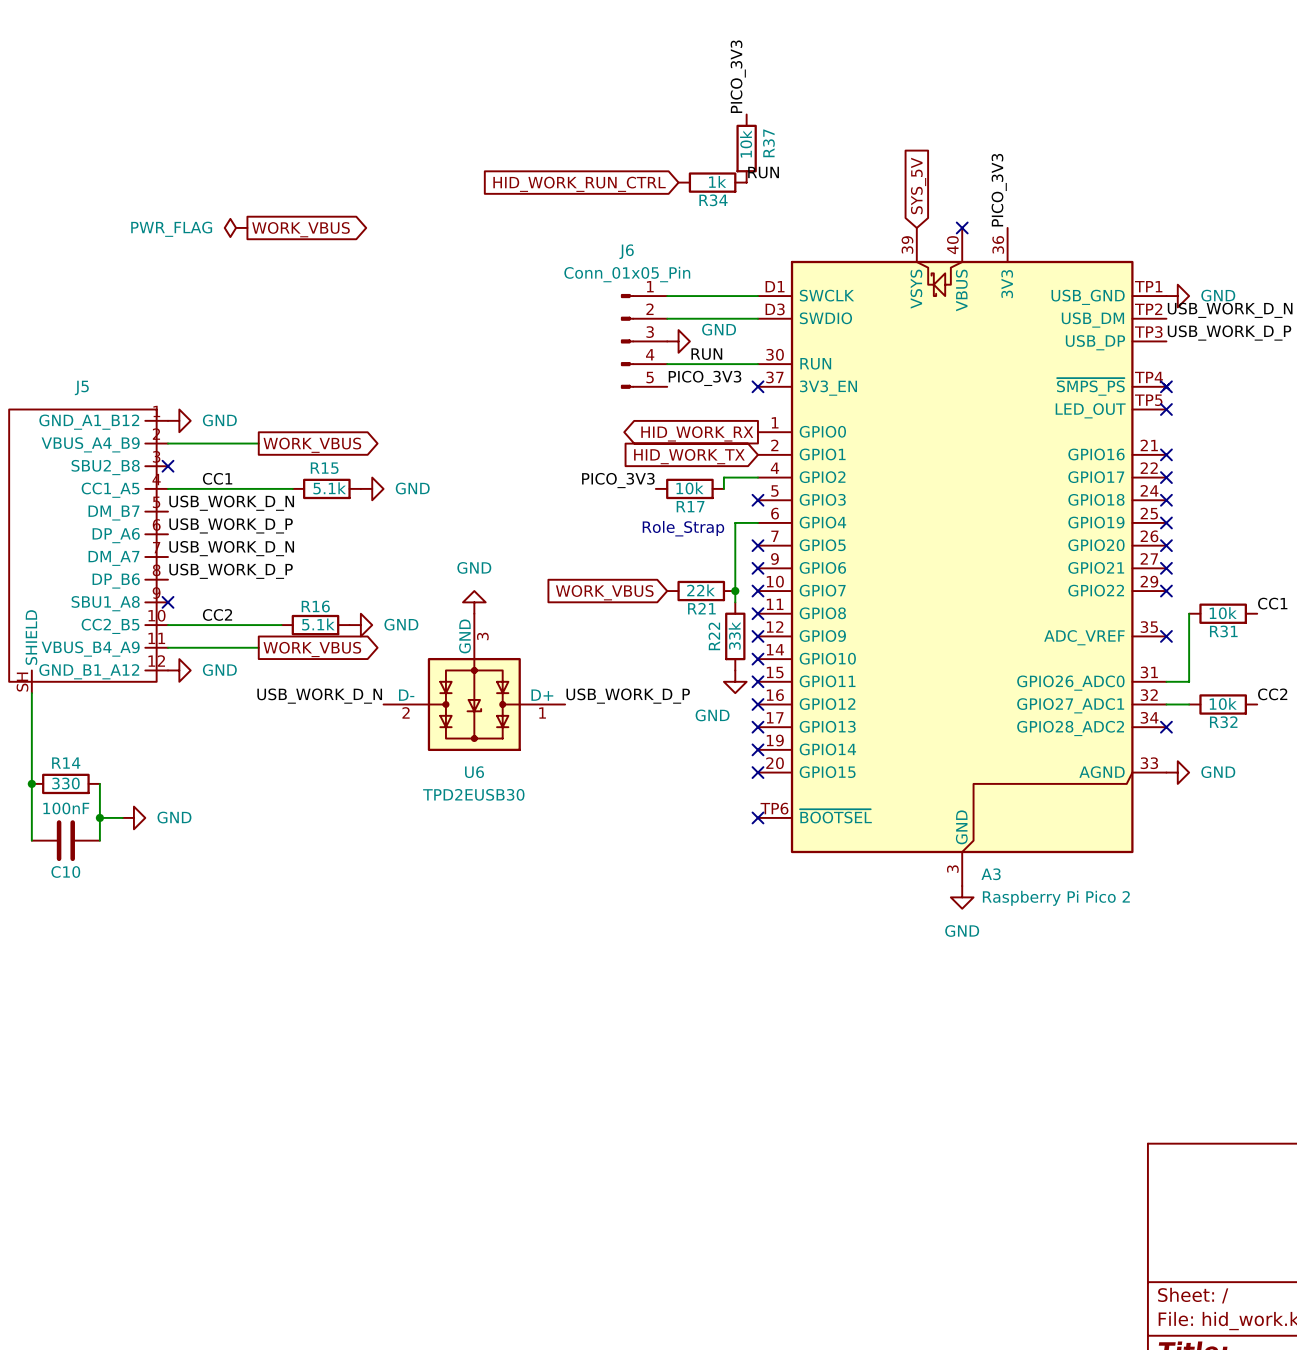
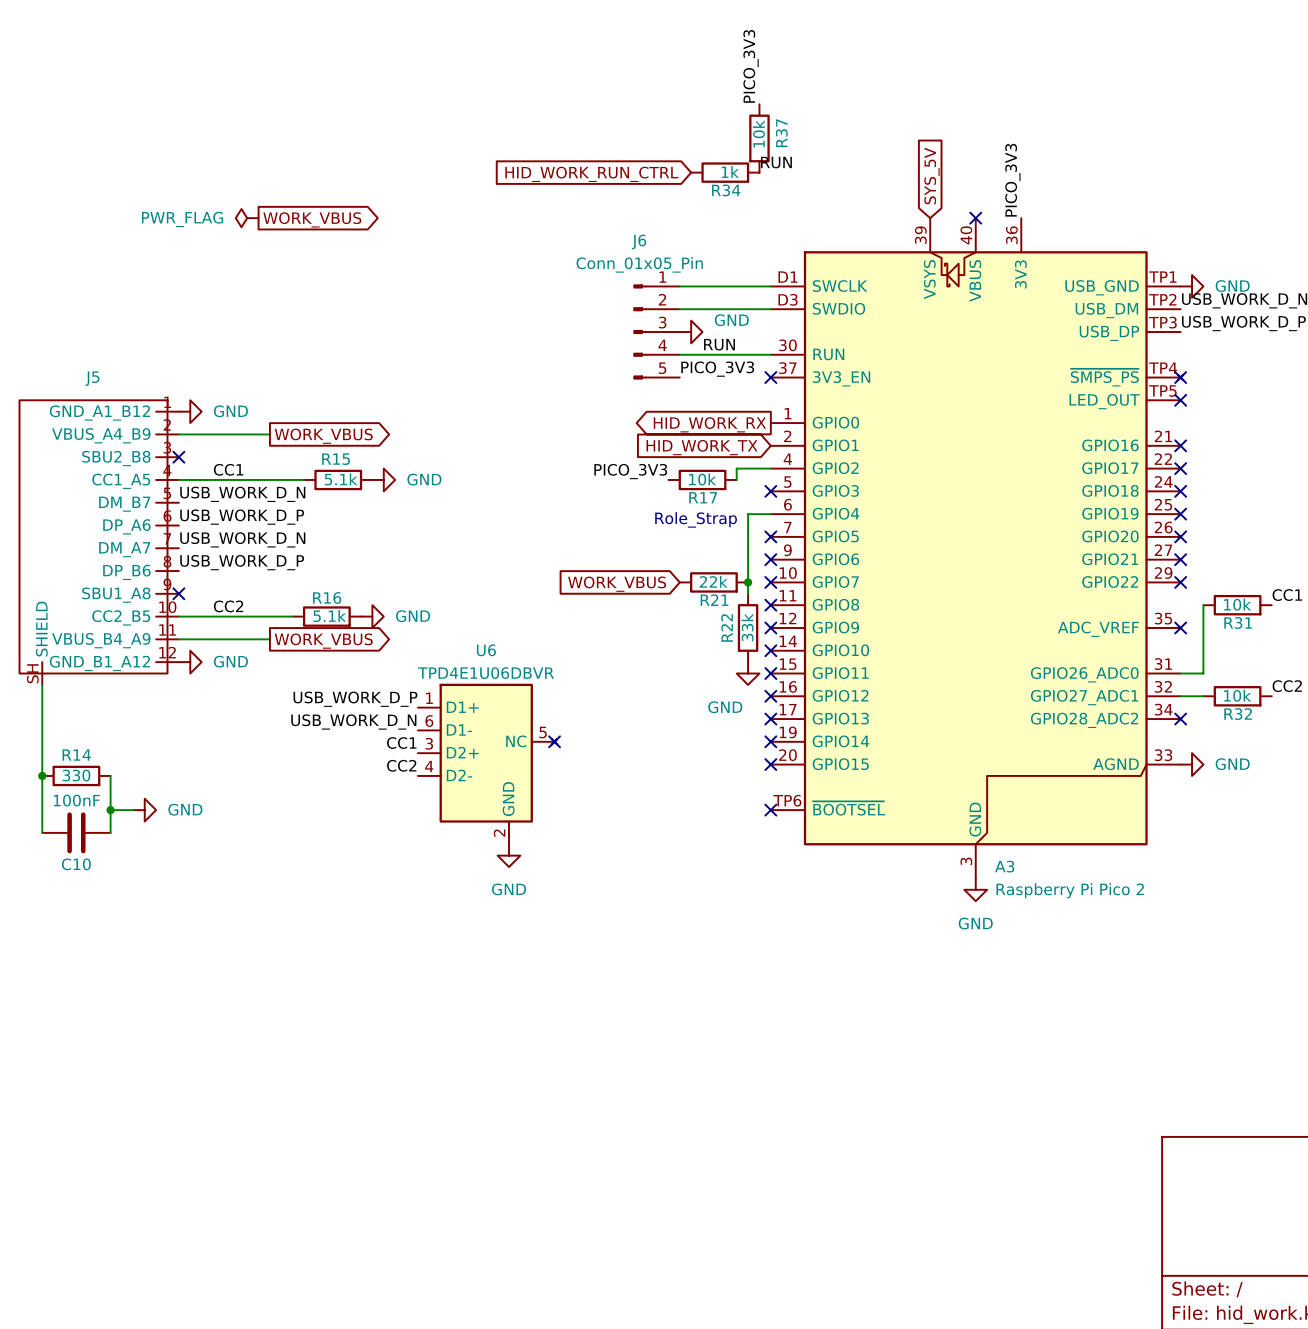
power symbol: GND (474, 602) -> none
U6 symbol: [383, 613, 566, 752] -> [417, 683, 558, 845]
label position: USB_WORK_D_N (319, 696) -> USB_WORK_D_N (353, 722)
label position: USB_WORK_D_P (628, 696) -> USB_WORK_D_P (355, 699)
no-connect mark: none -> (554, 741)
label: none -> CC1 (401, 743)
U6 name position: U6 (474, 772) -> U6 (486, 650)
label: none -> CC2 (401, 765)
U6 value: TPD2EUSB30 (473, 794) -> TPD4E1U06DBVR (486, 673)
power symbol: none -> GND (509, 855)

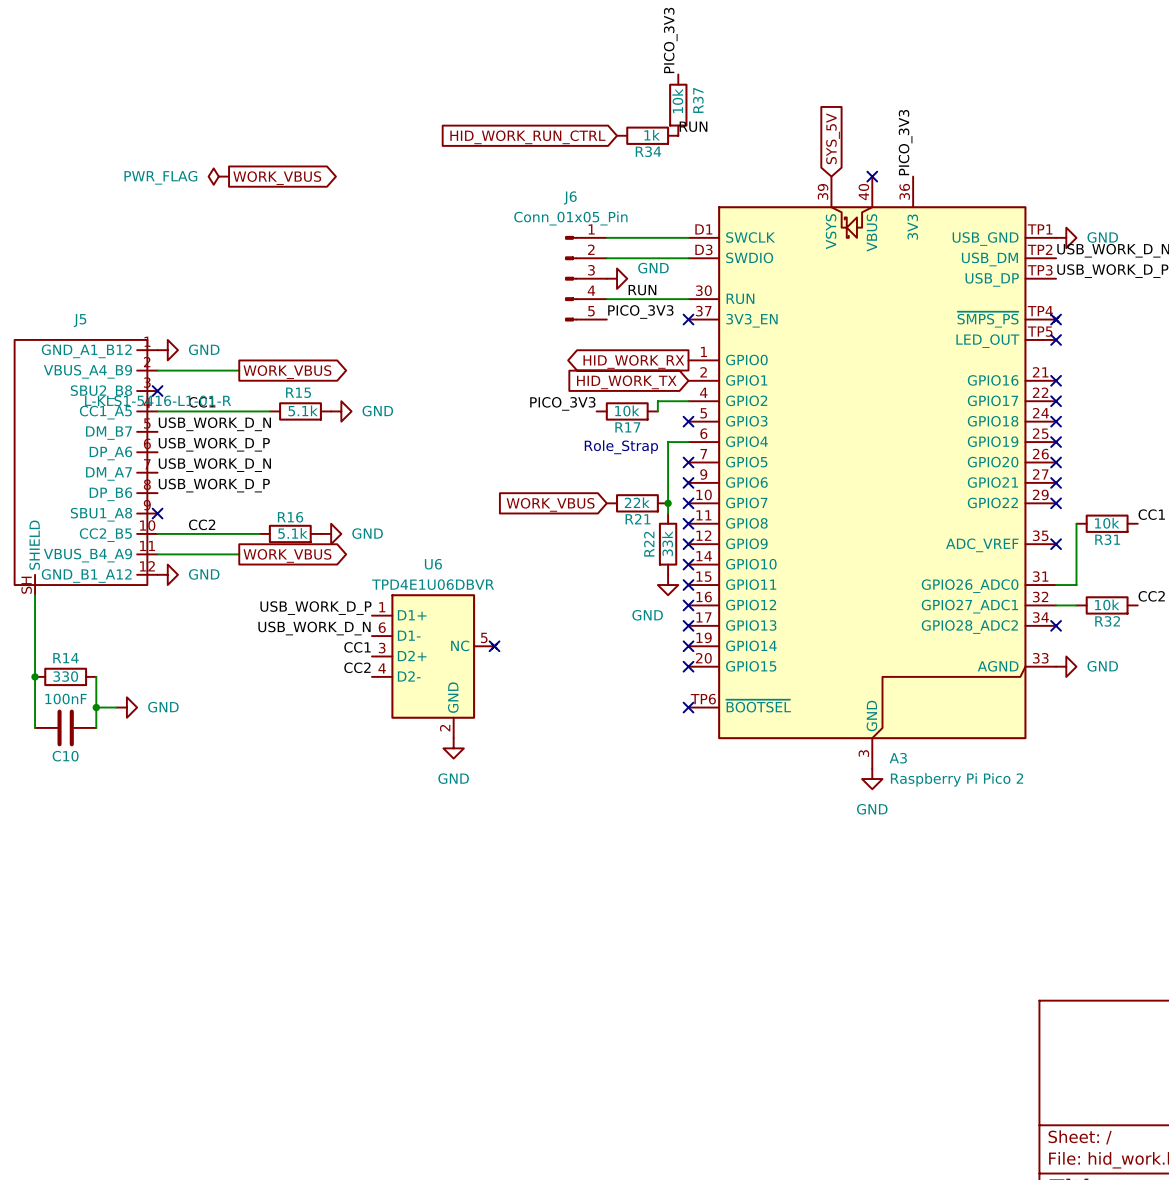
J5 value: none -> L-KLS1-5416-L1-01-R (158, 400)

